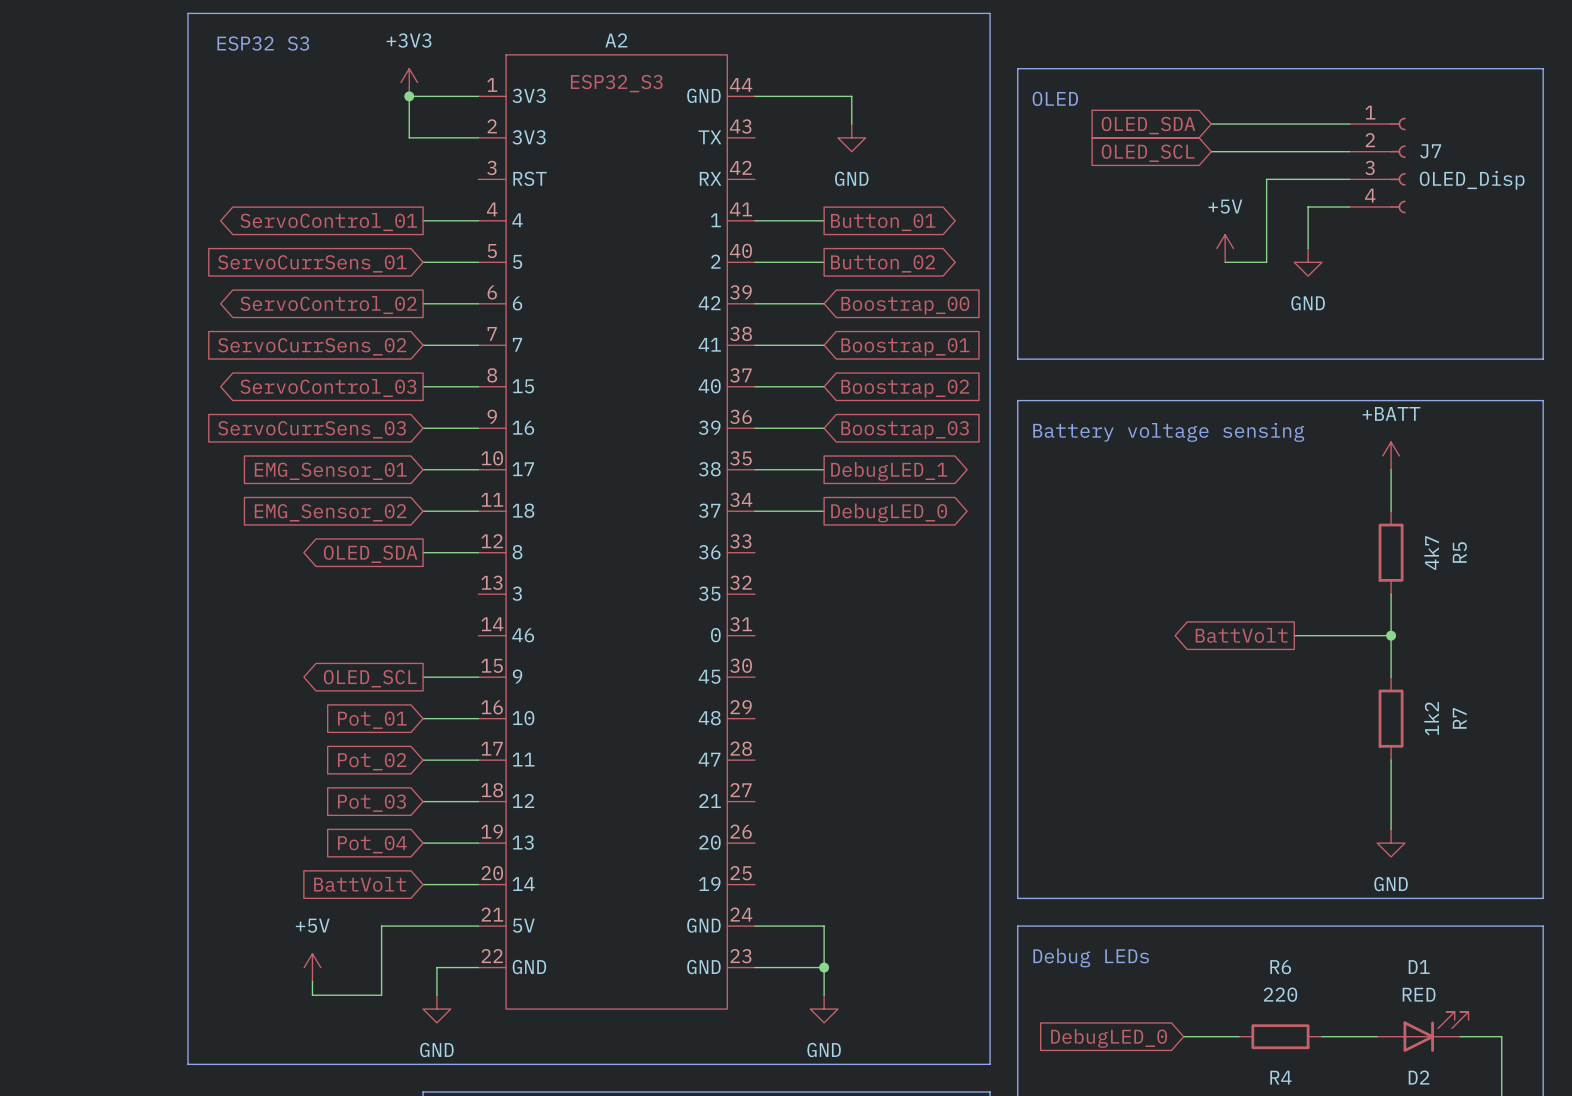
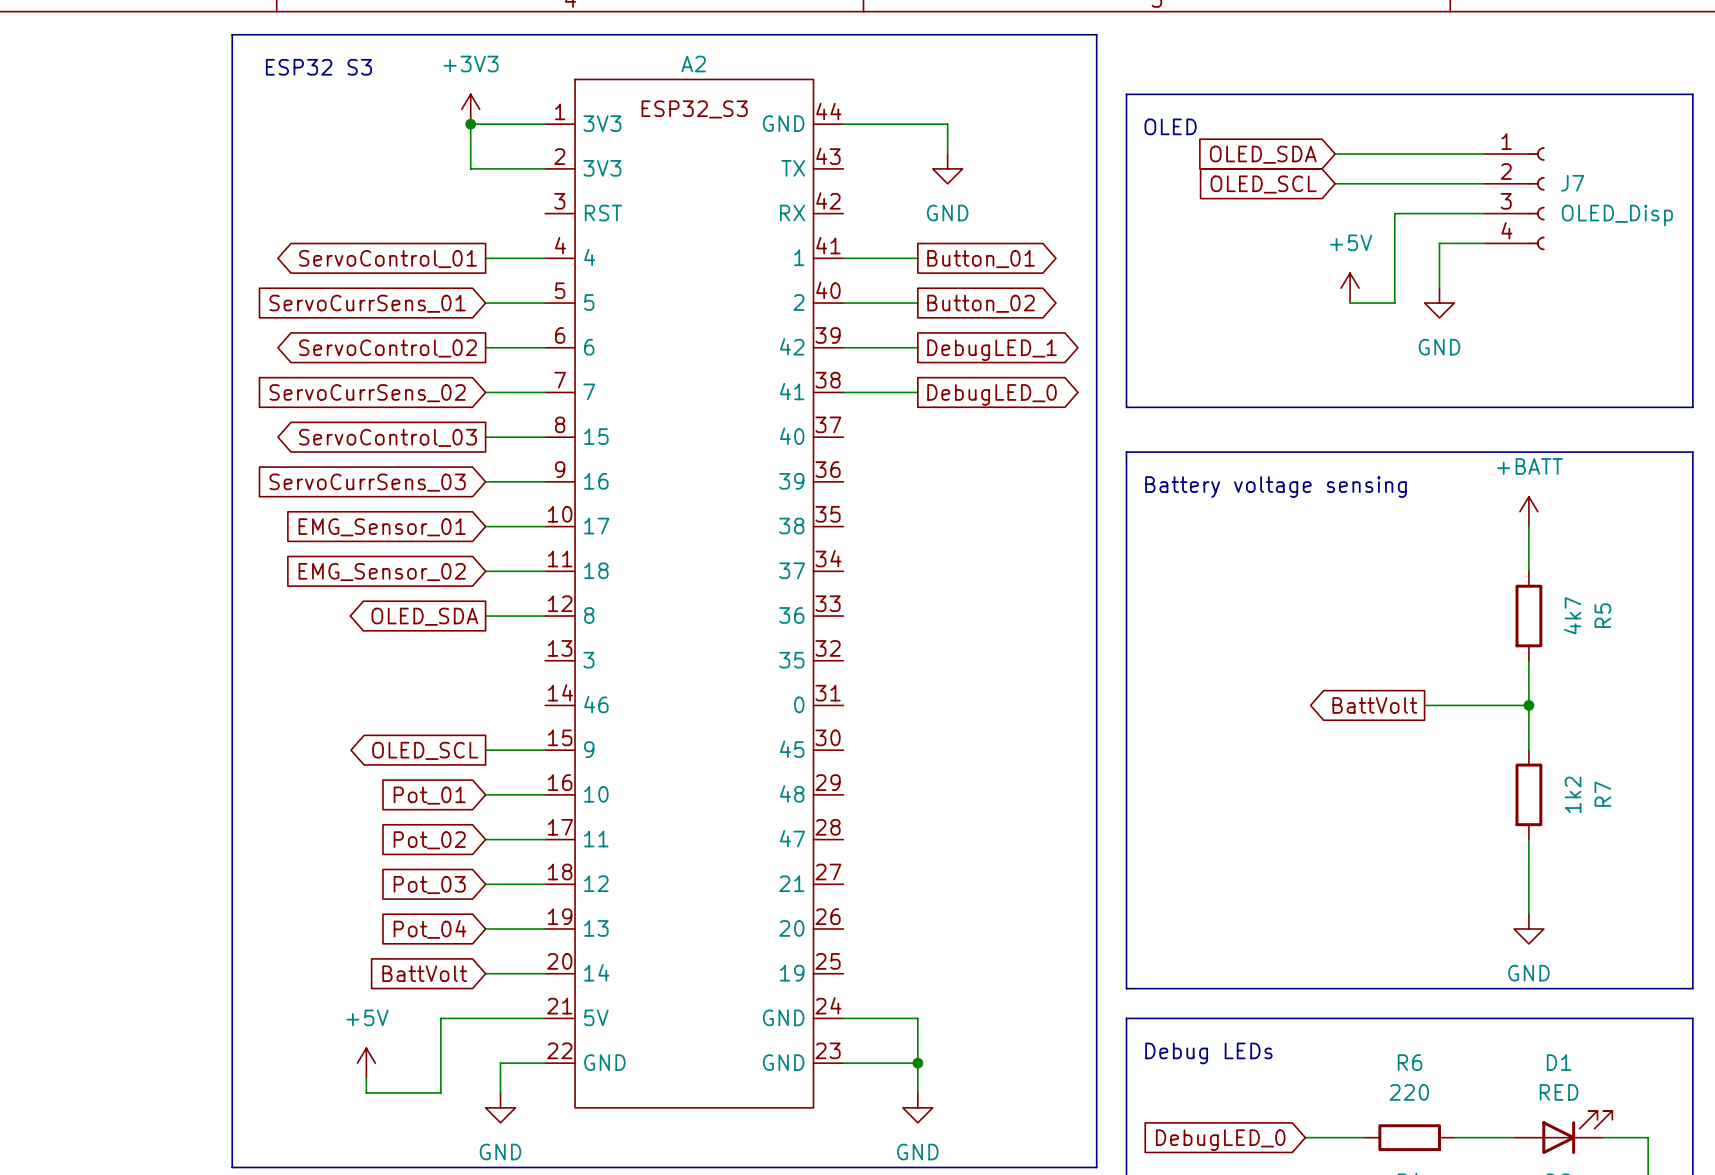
global label shape: input (905, 305) -> output (992, 350)
global label: Boostrap_00 (905, 305) -> DebugLED_1 (992, 350)
global label shape: input (905, 347) -> output (992, 394)
global label: Boostrap_01 (905, 347) -> DebugLED_0 (992, 394)
wire: (754, 386) (824, 386) -> none
global label: Boostrap_02 (905, 388) -> none
wire: (754, 428) (824, 428) -> none
global label: Boostrap_03 (905, 430) -> none
wire: (754, 469) (824, 469) -> none
global label: DebugLED_1 (889, 471) -> none
wire: (754, 511) (824, 511) -> none
global label: DebugLED_0 (889, 512) -> none

